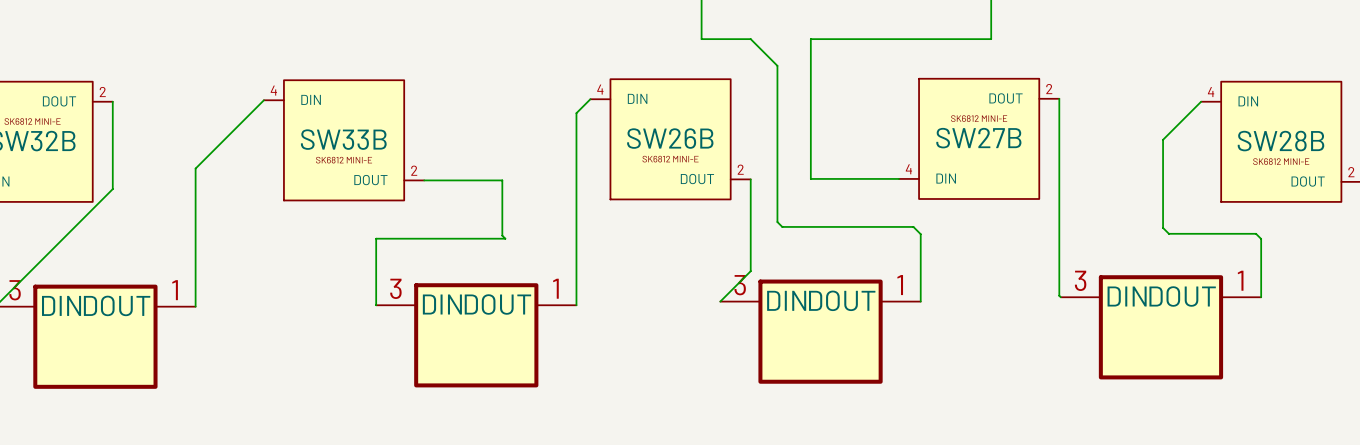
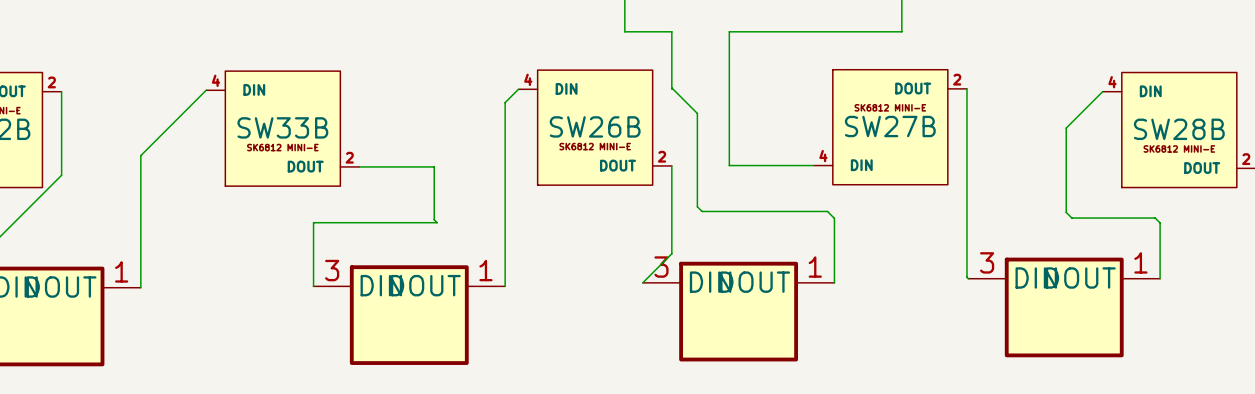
wire: (750, 39) (777, 65) (777, 124) -> (671, 31) (671, 89)
wire: none -> (671, 87) (697, 113)

